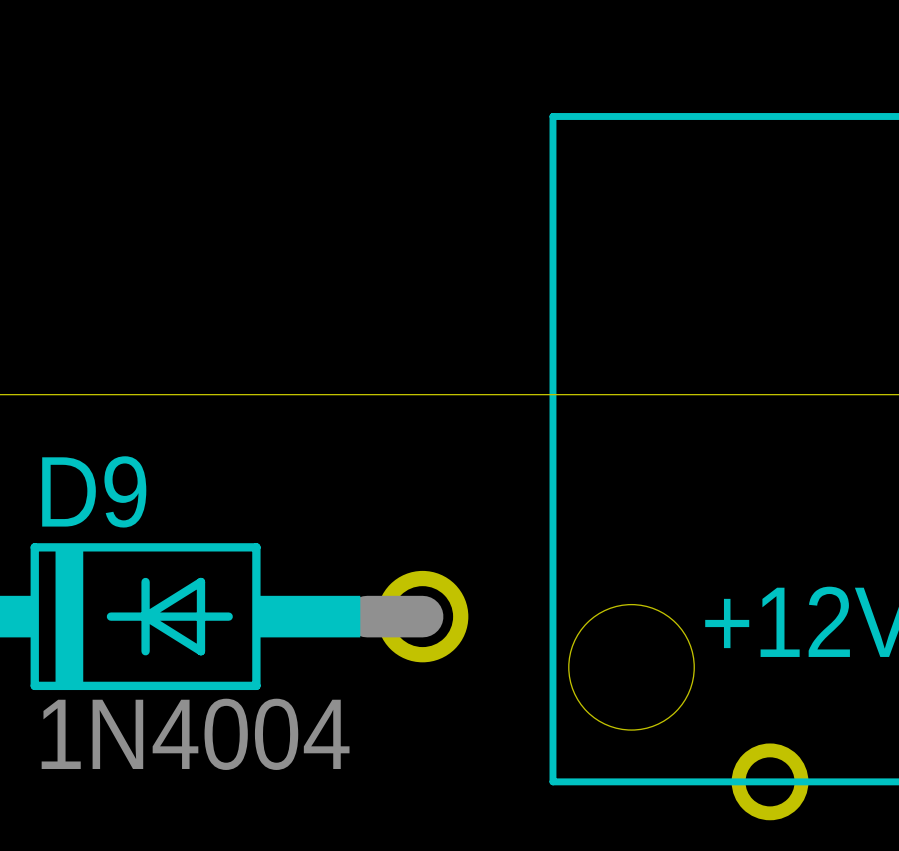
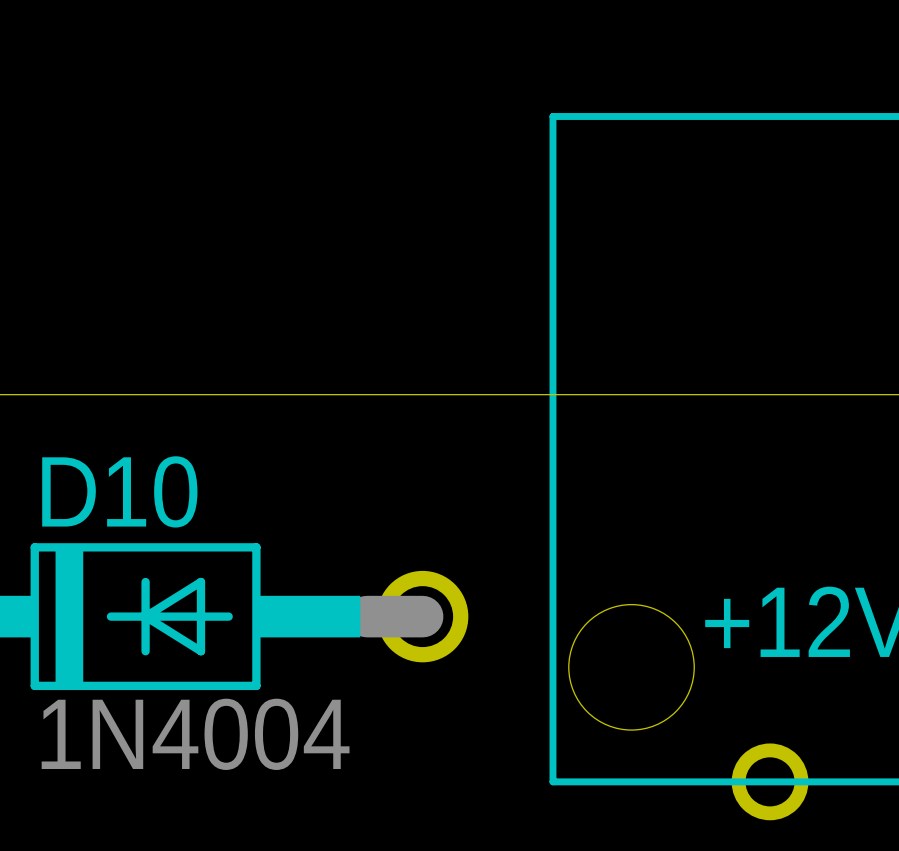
D9 name: D9 (94, 491) -> D10 (119, 491)

